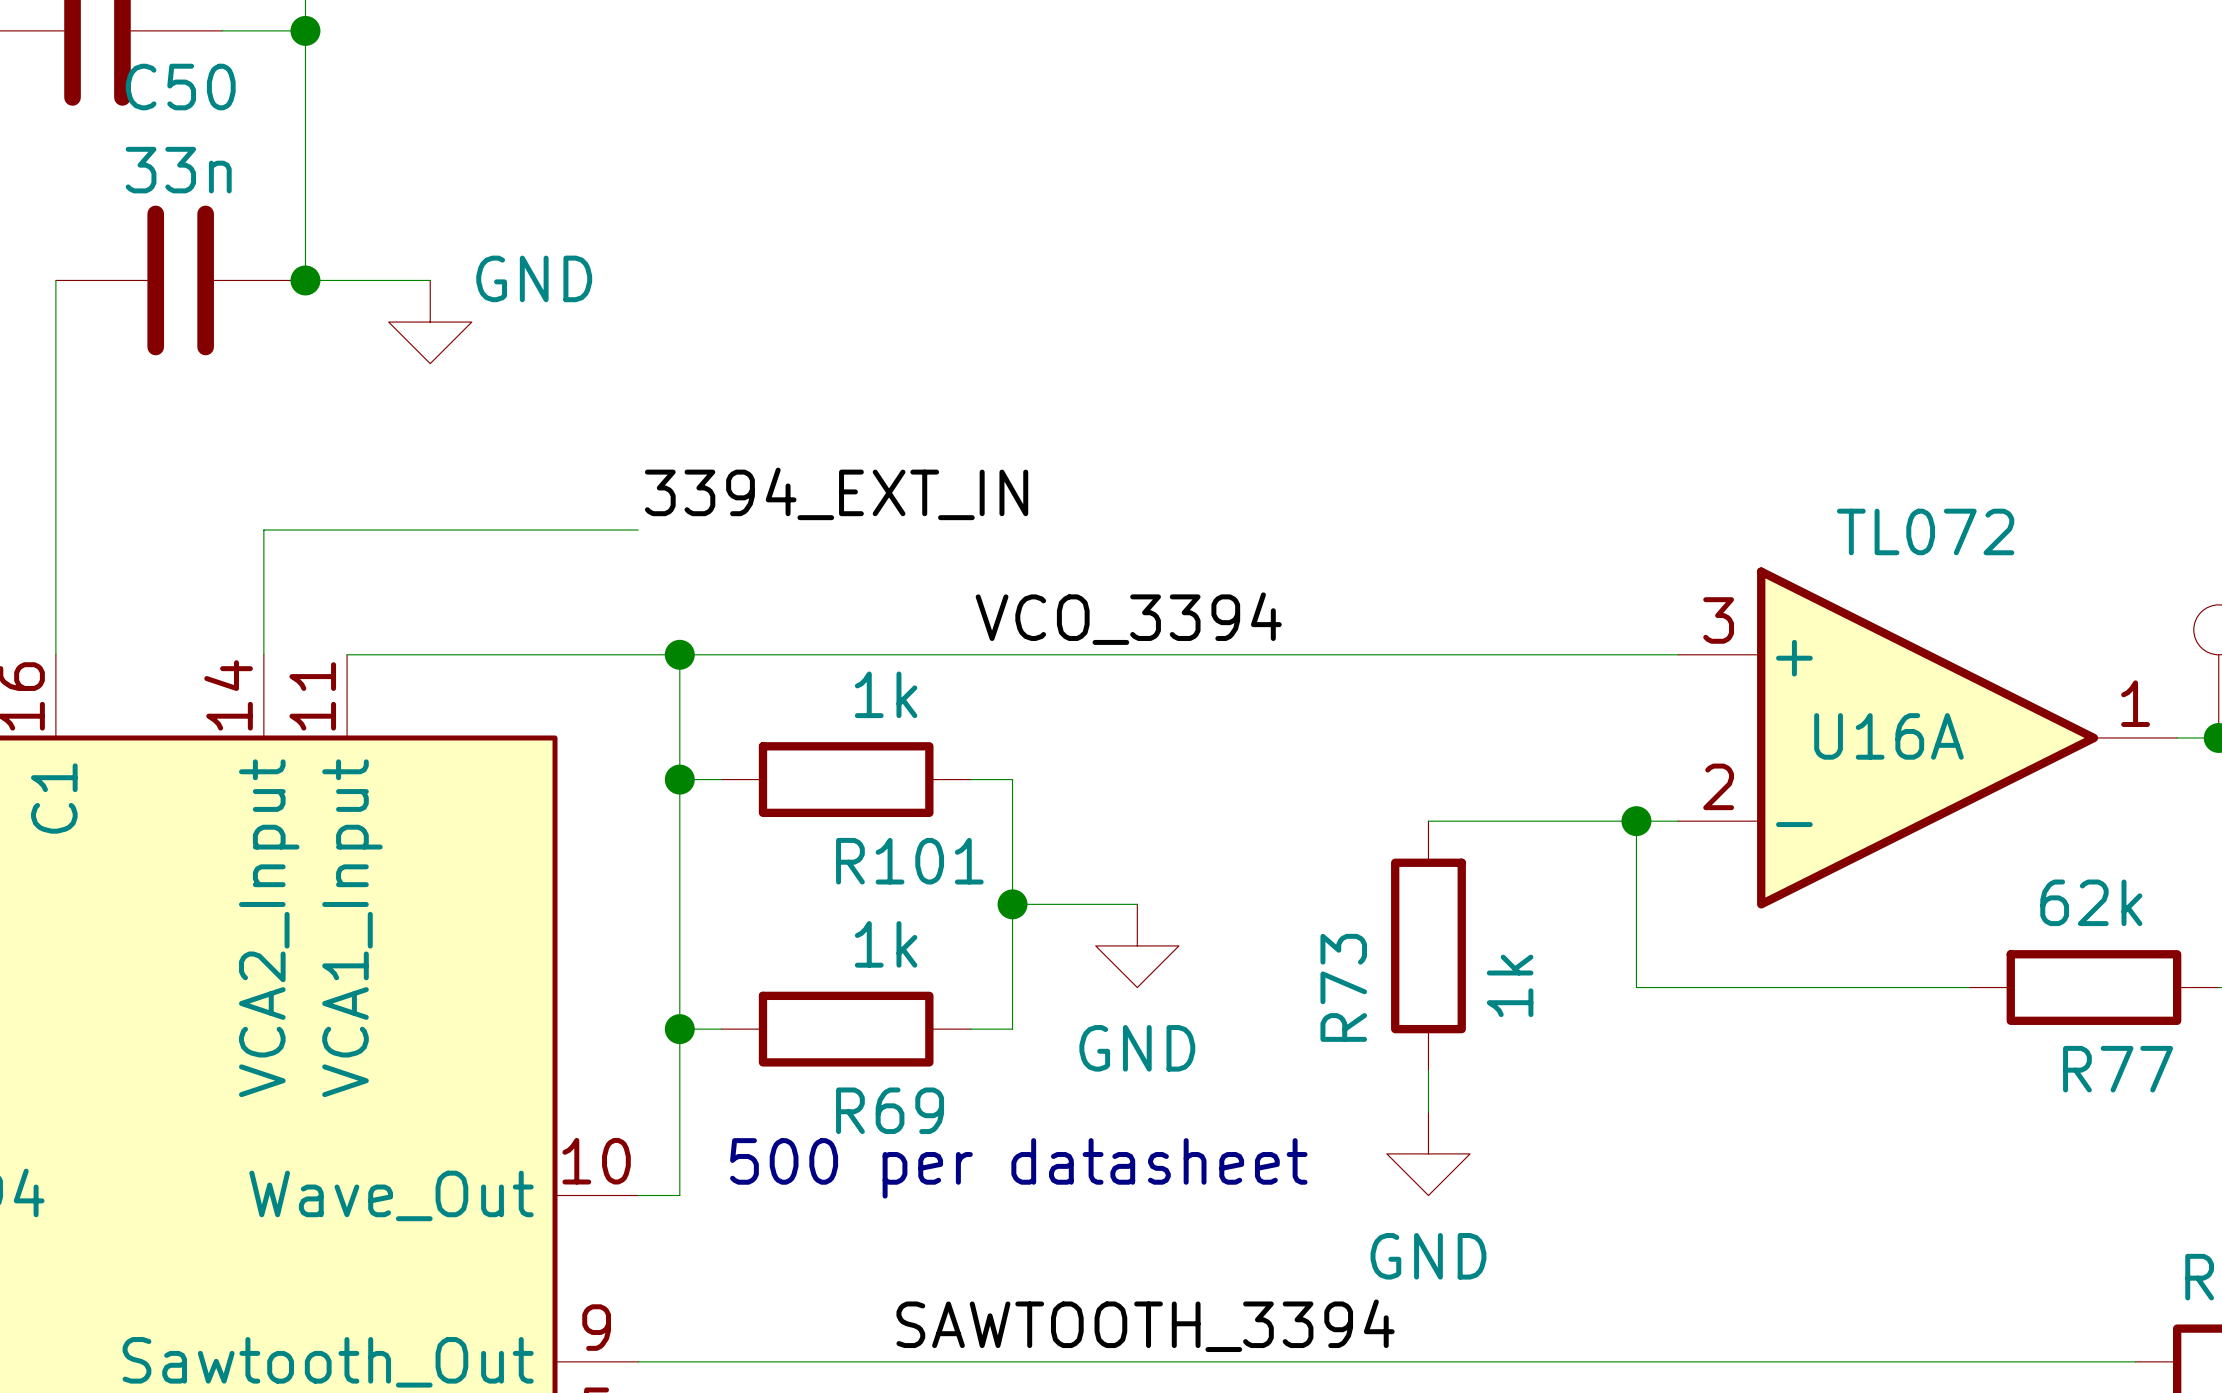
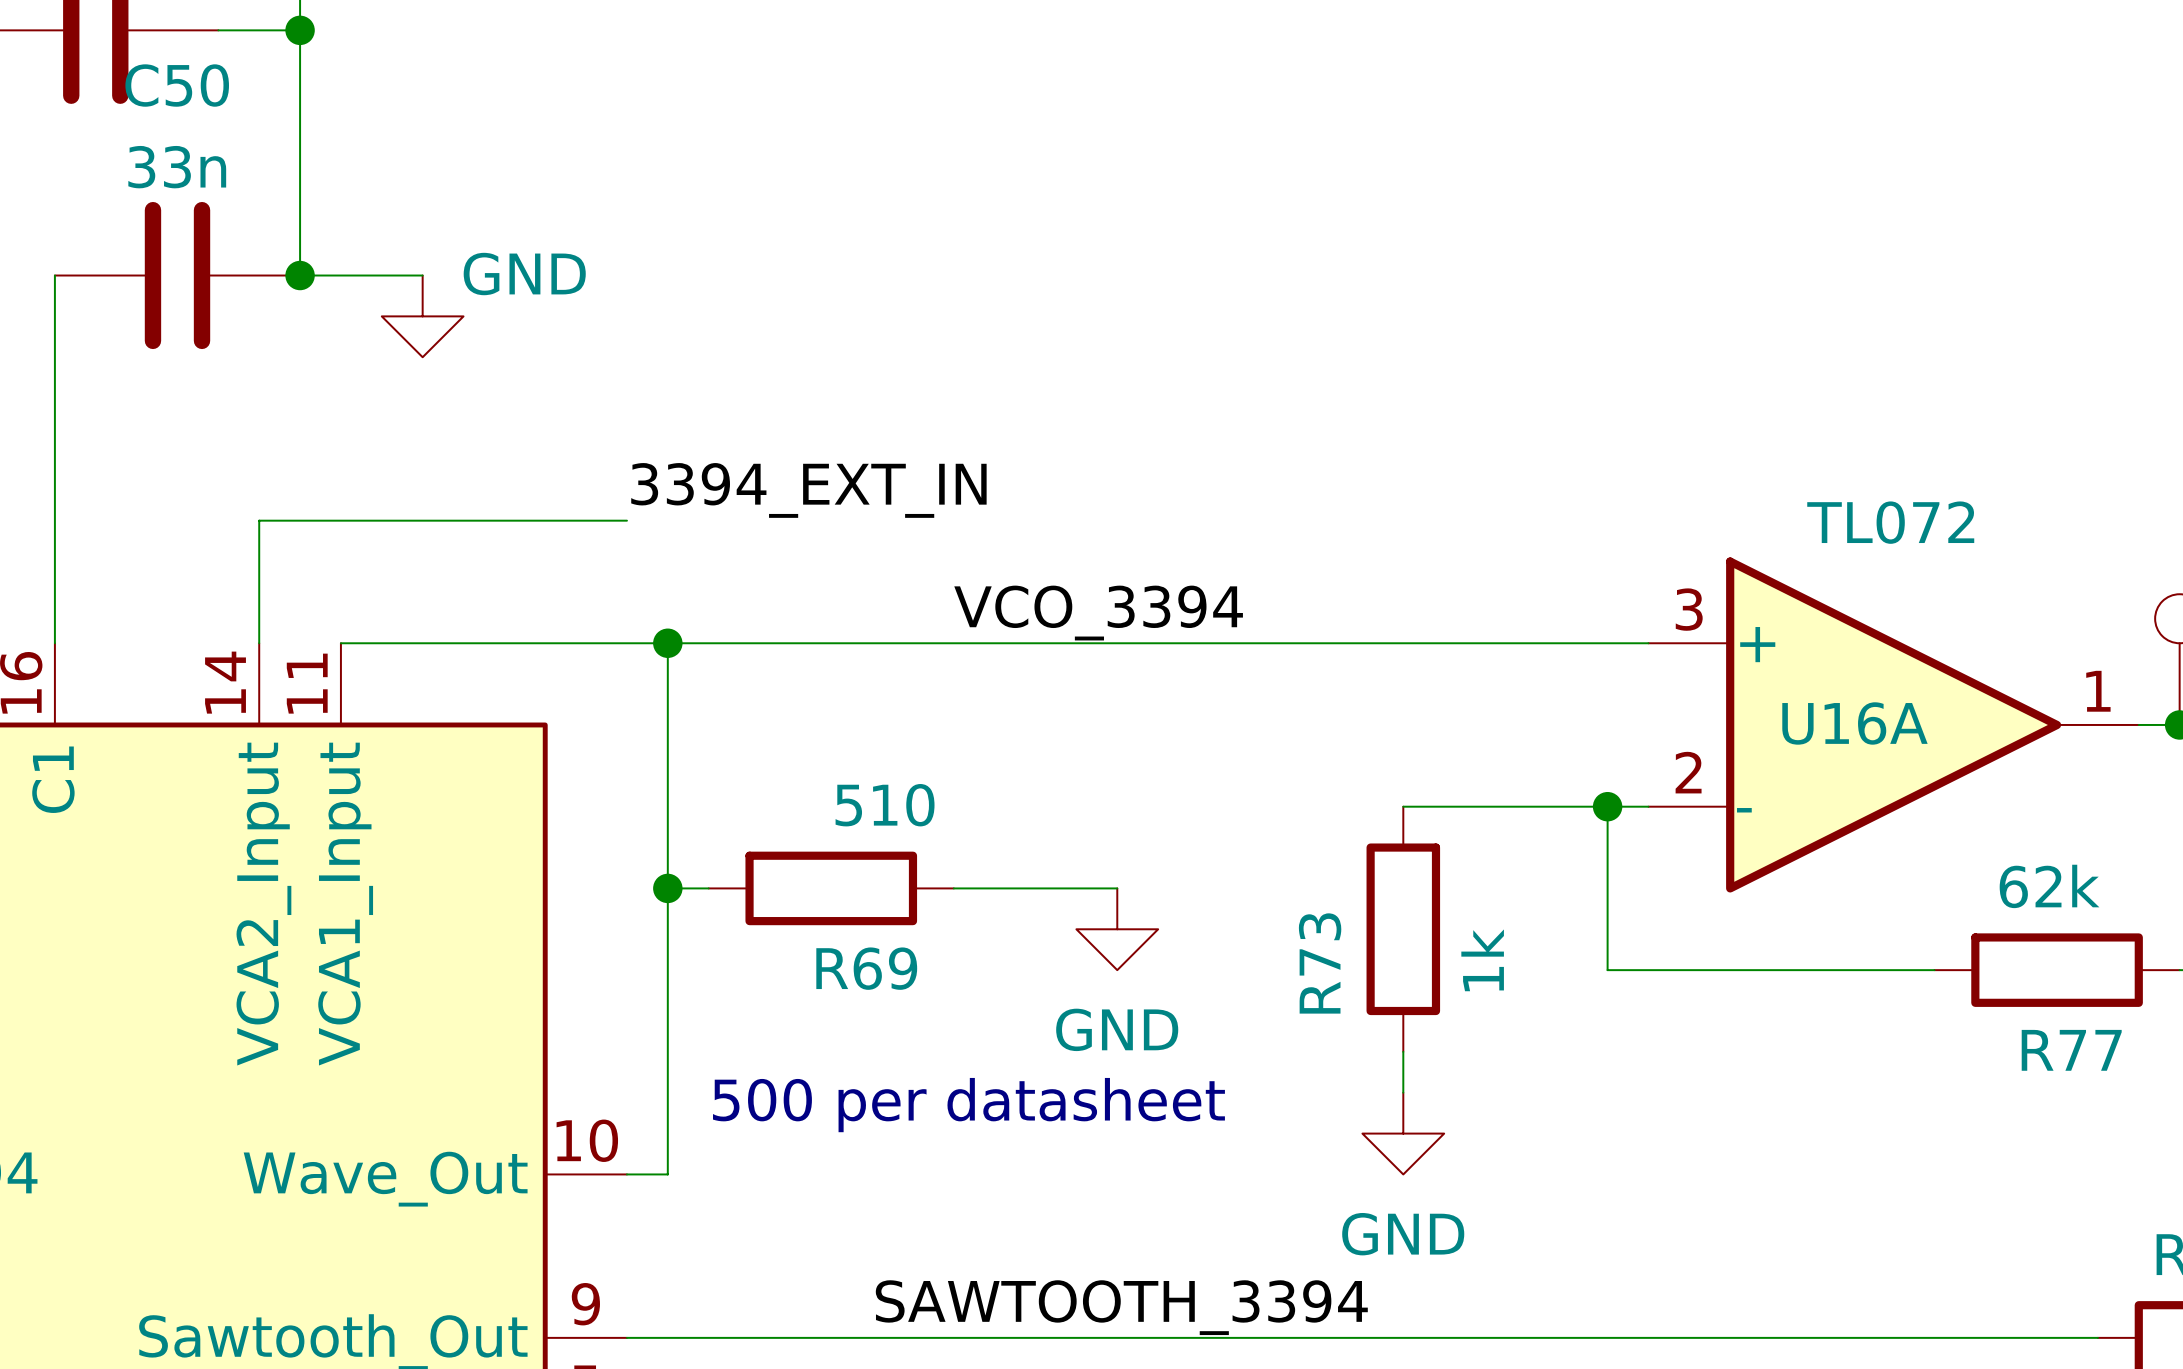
wire: (679, 779) (721, 779) -> (667, 888) (708, 888)
junction: (679, 779) -> none
R101: 1k (846, 779) -> none
wire: (970, 779) (1012, 779) (1012, 1029) (970, 1029) -> none
junction: none -> (667, 888)
junction: (1012, 904) -> none
R69 value: 1k (886, 944) -> 510 (885, 805)
wire: (679, 1029) (721, 1029) -> (953, 888) (994, 888)
junction: (679, 1029) -> none
R69 position: (846, 1029) -> (831, 888)
text position: 500 per datasheet (1018, 1168) -> 500 per datasheet (968, 1105)

